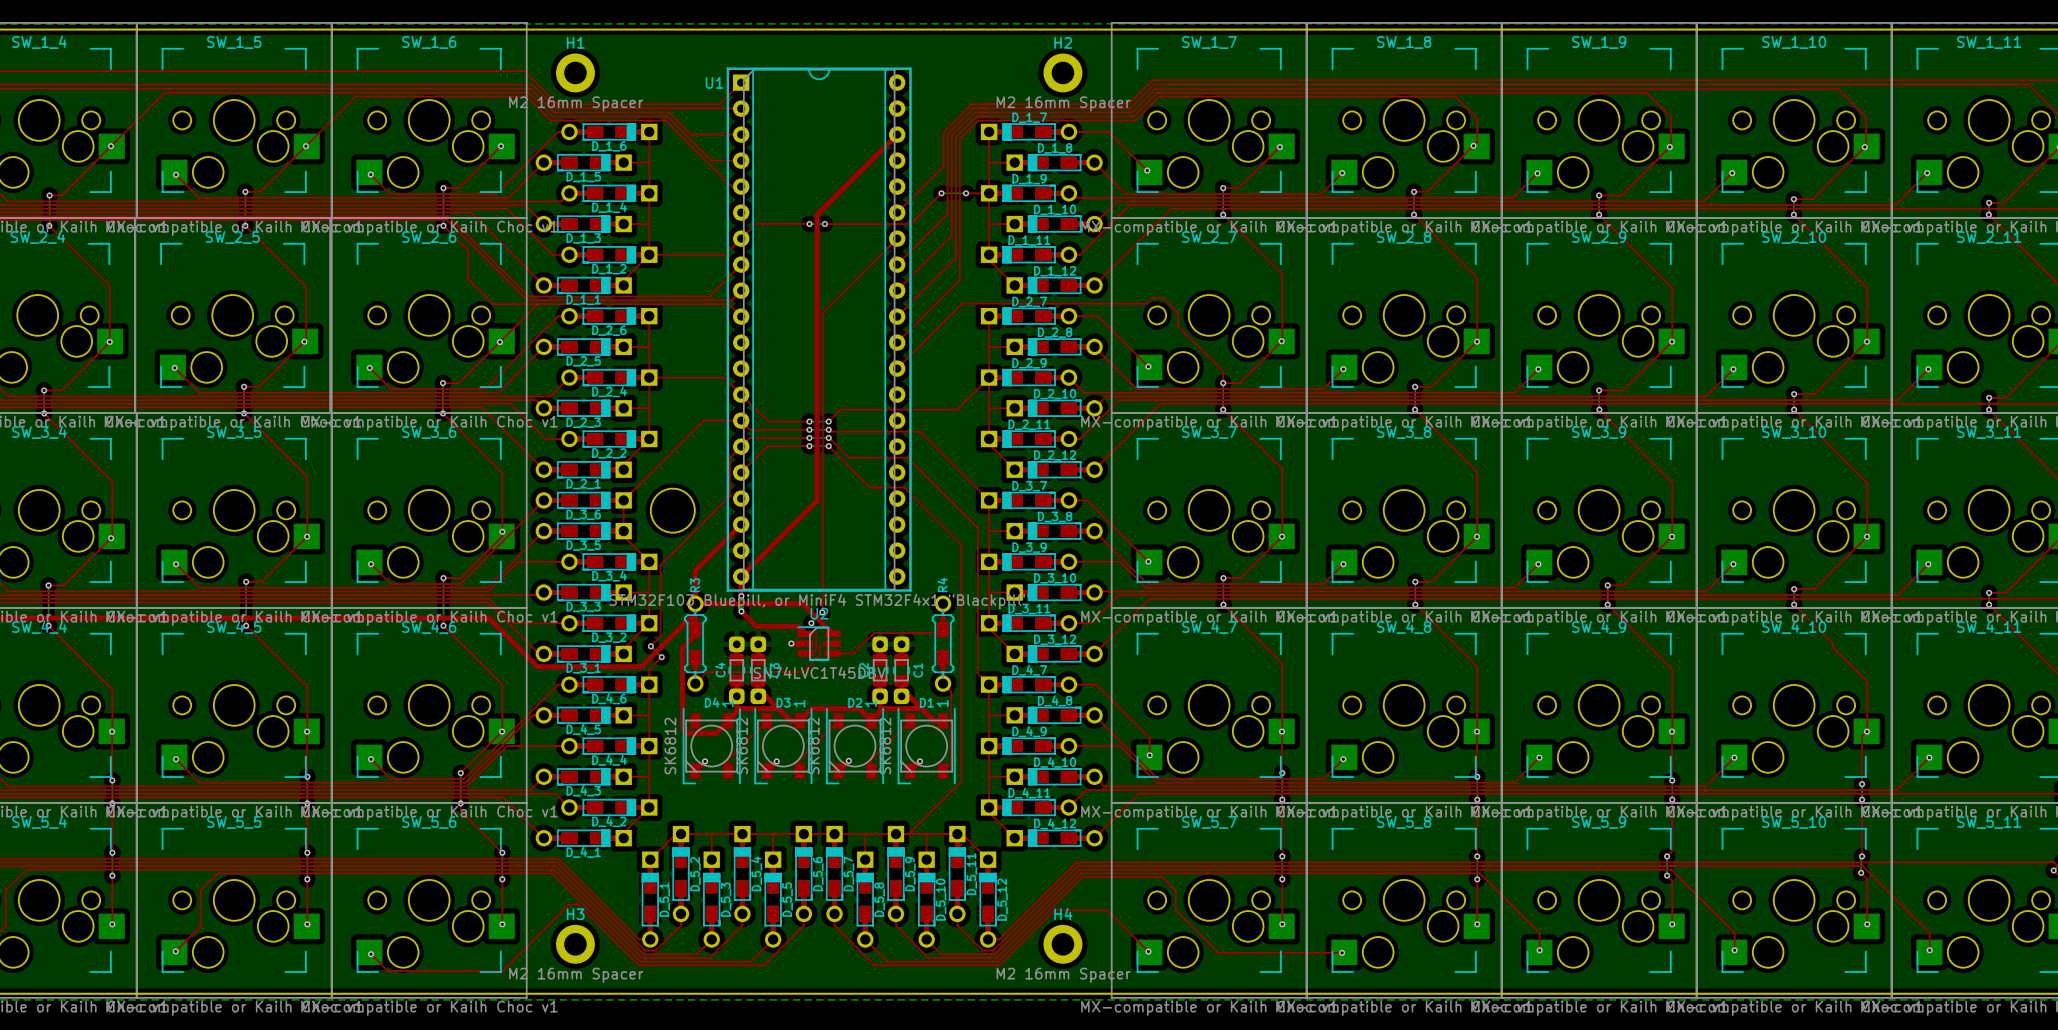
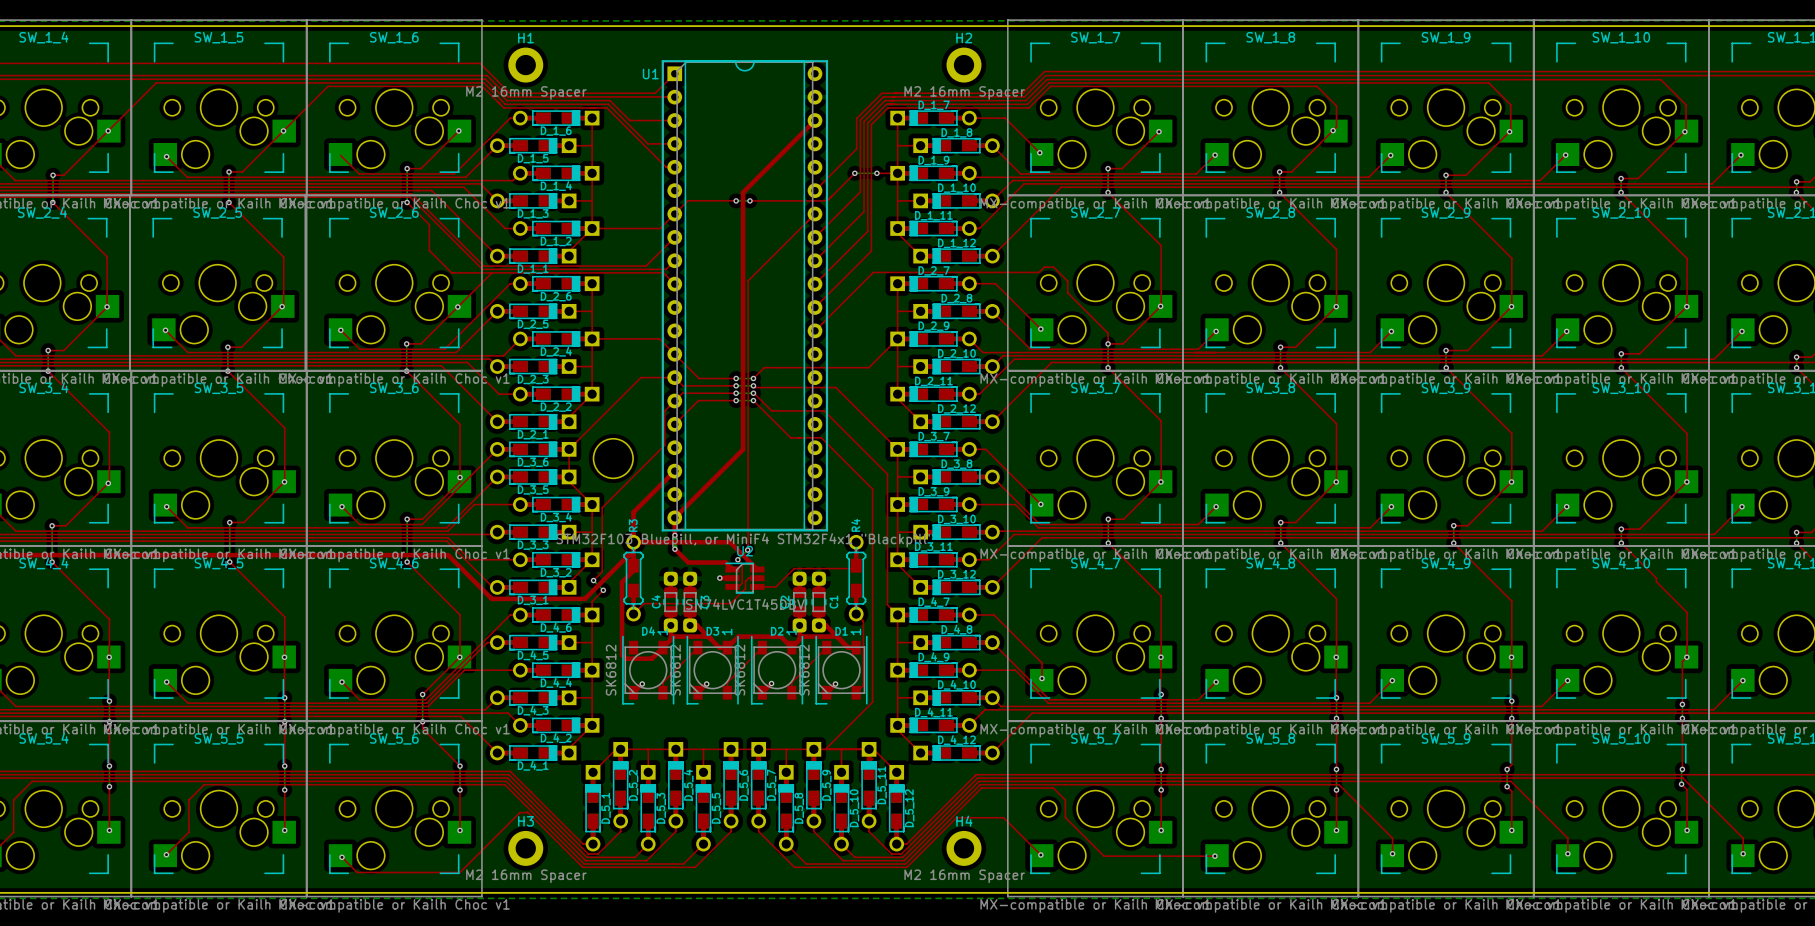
via: (370, 174) -> none

